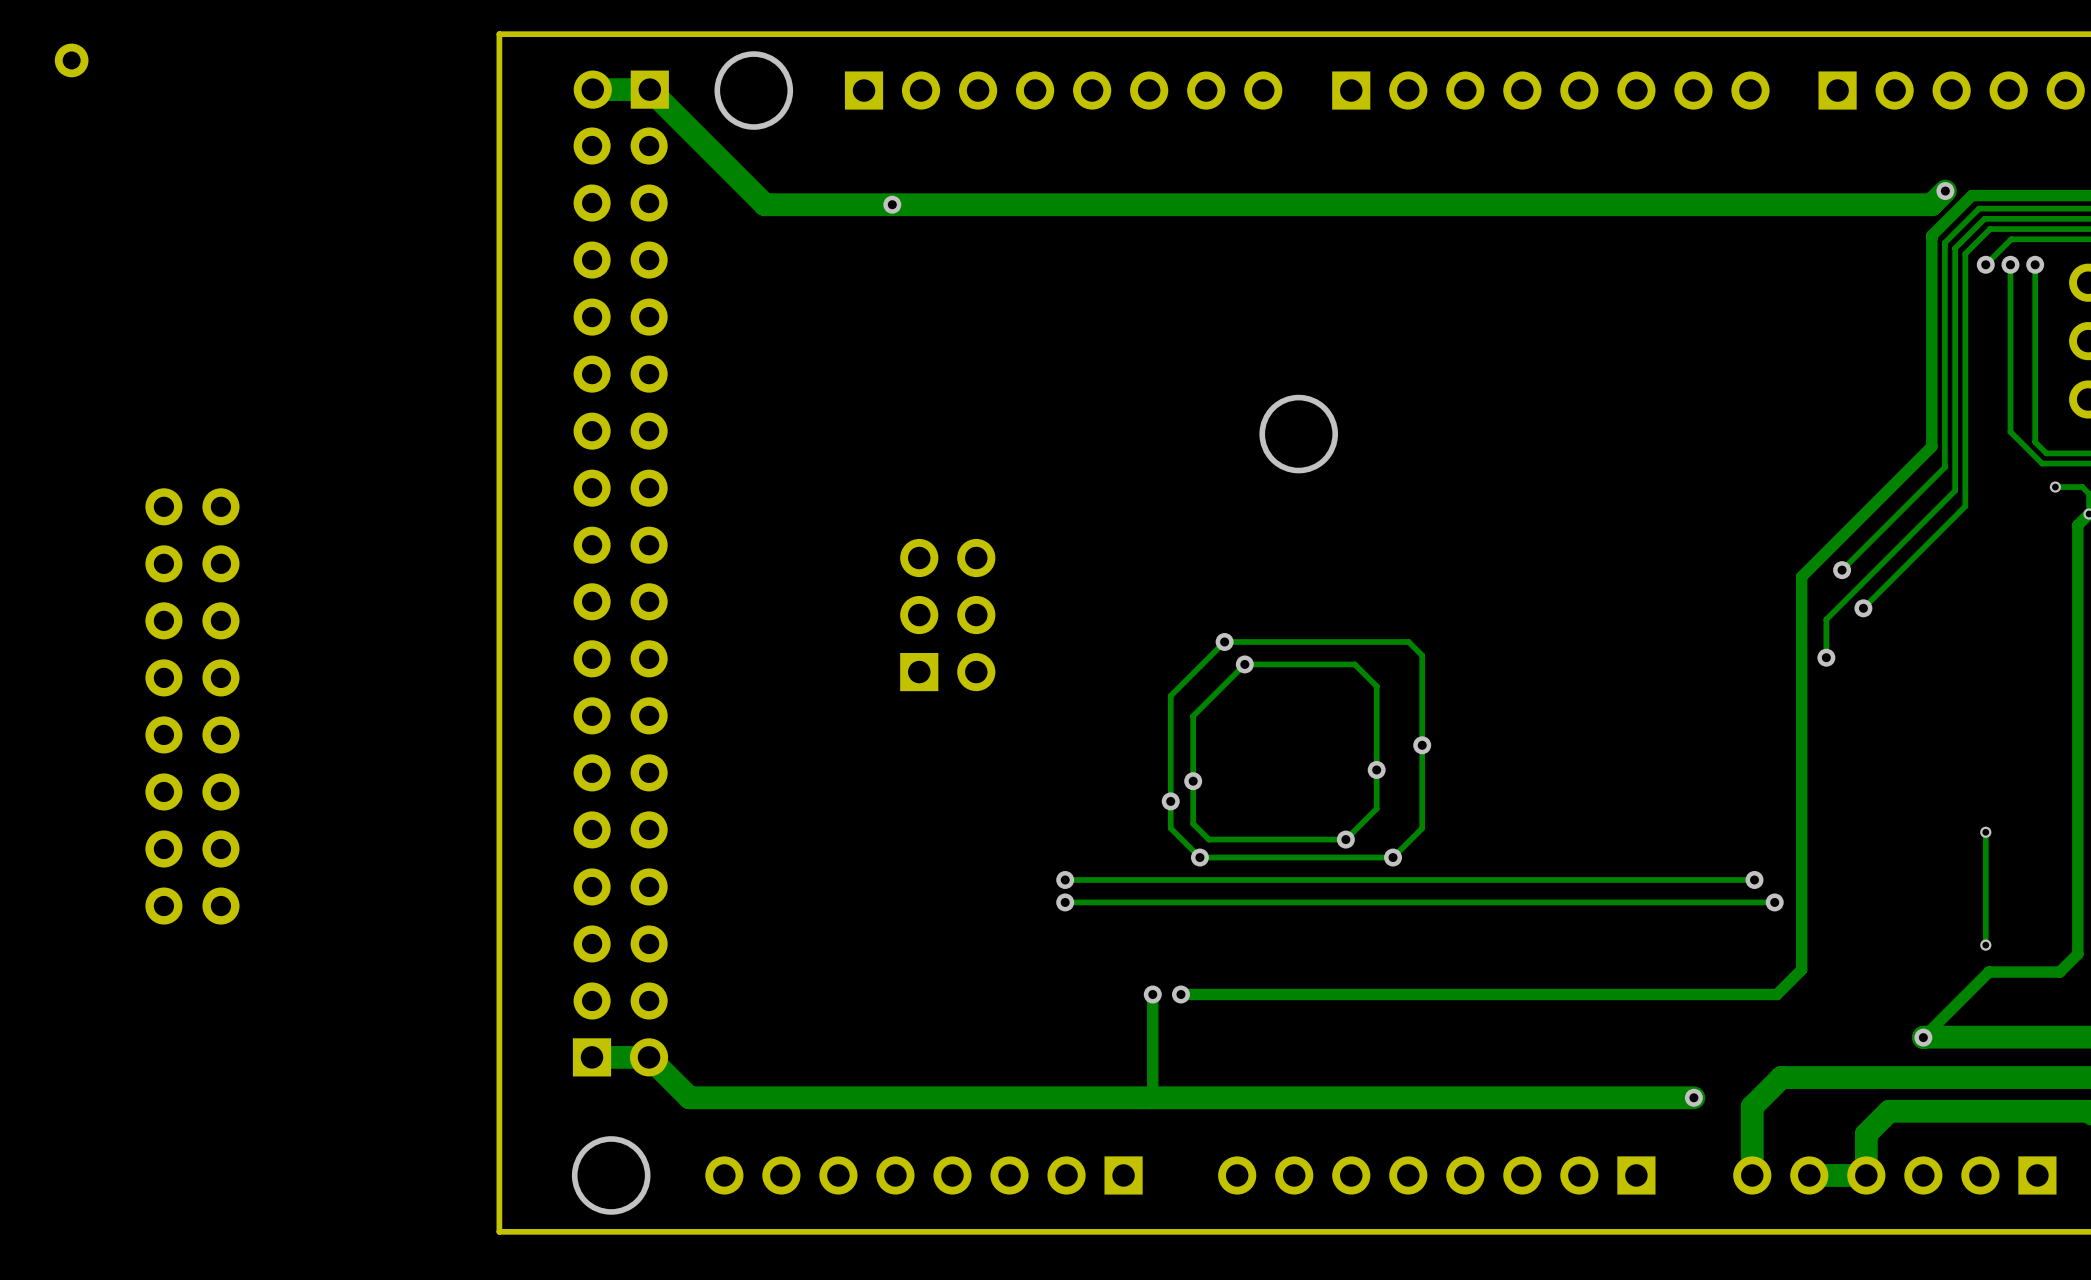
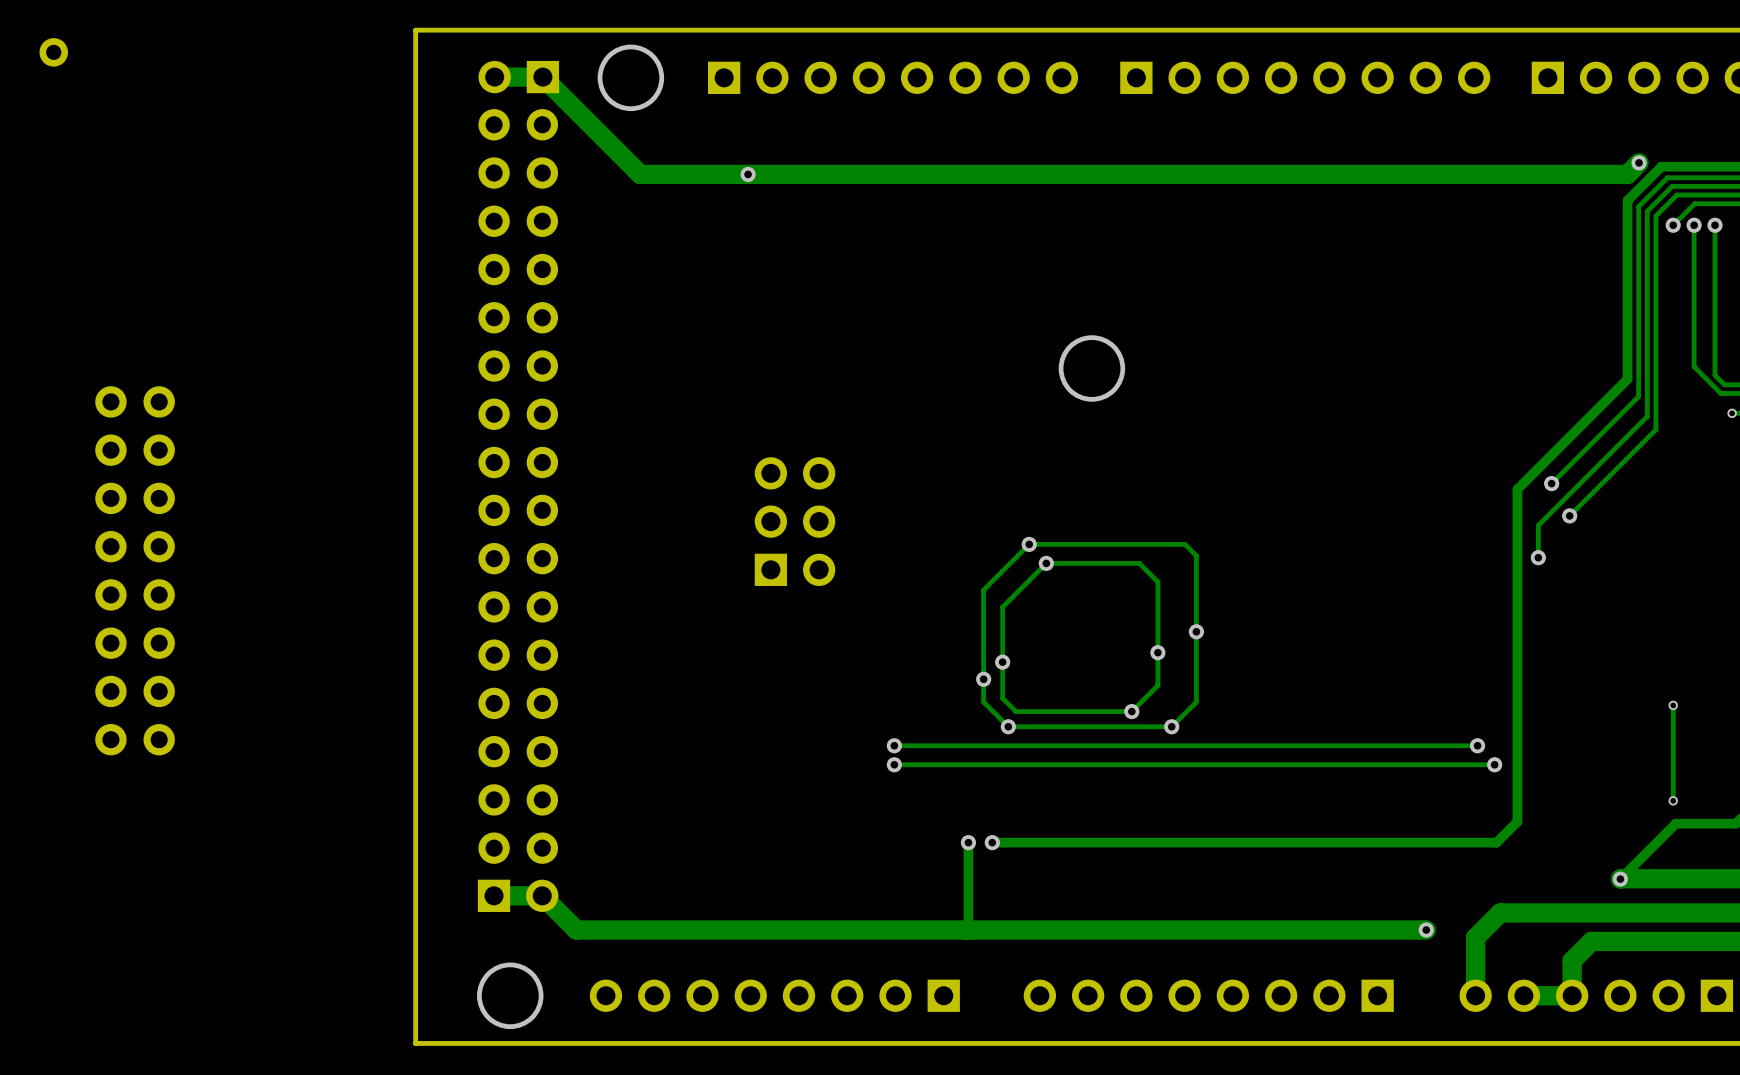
part position: (192, 706) -> (135, 570)

